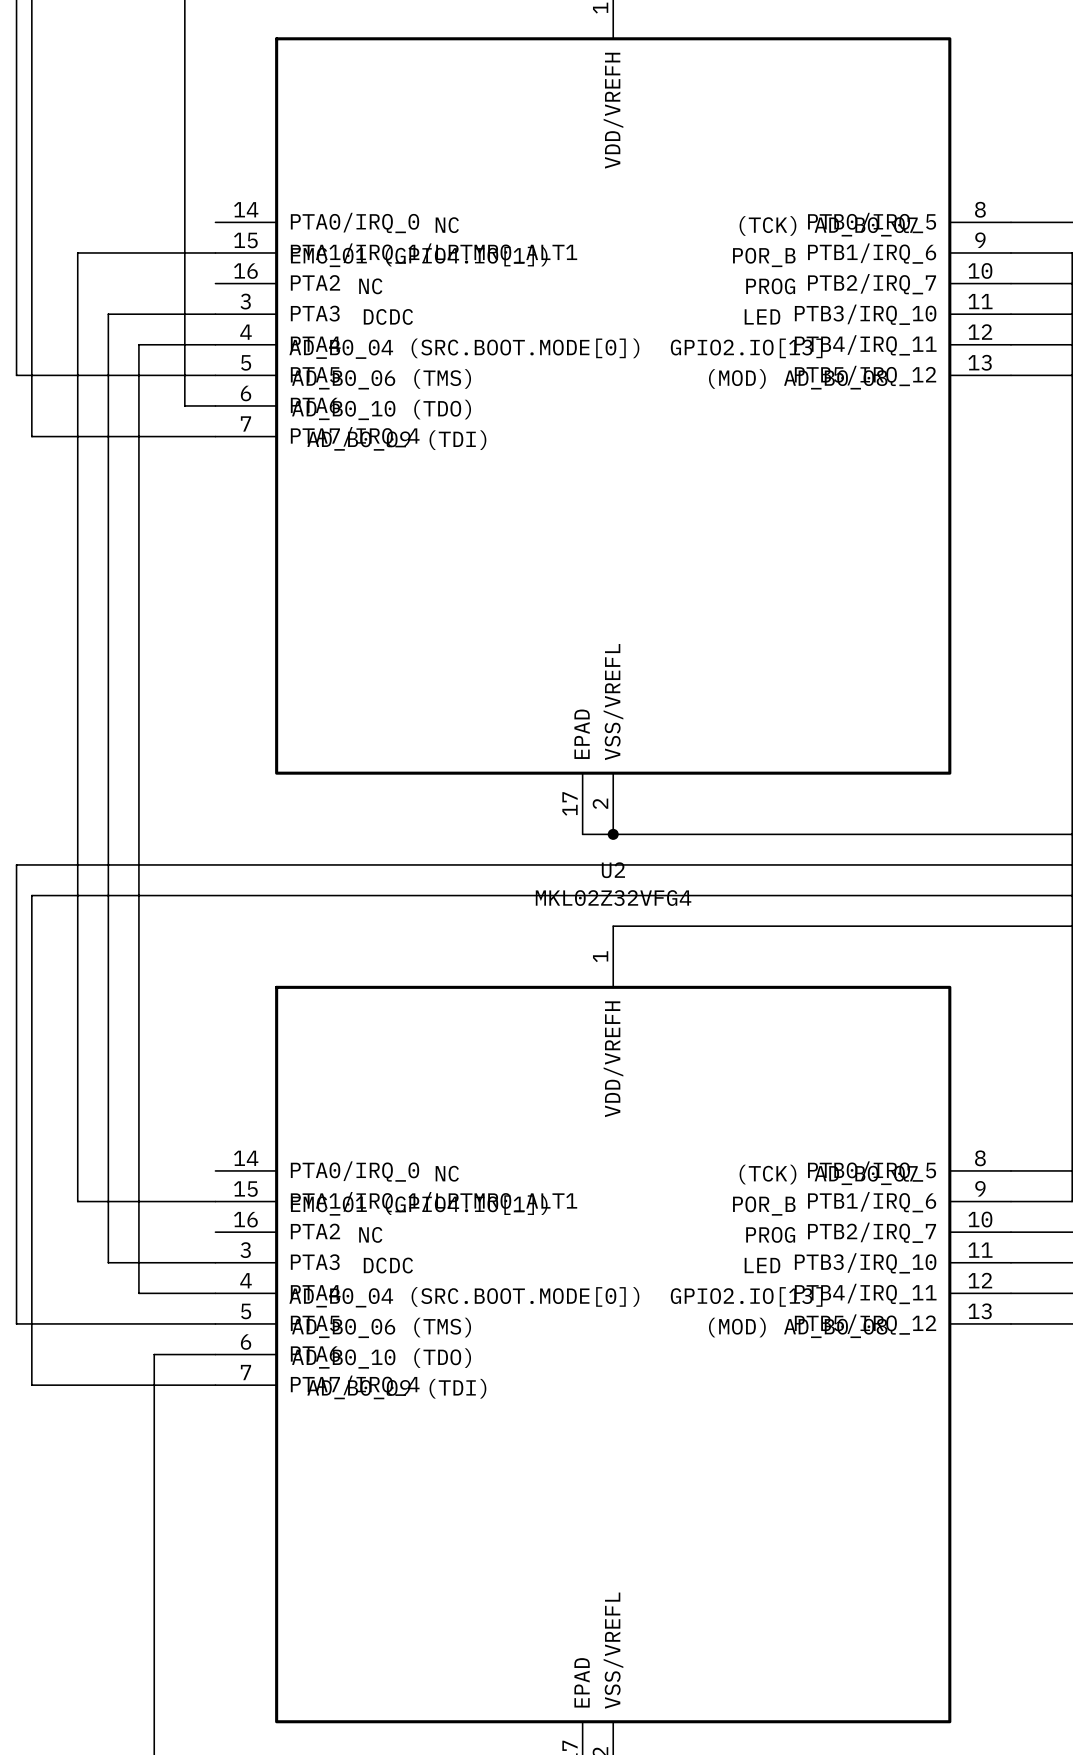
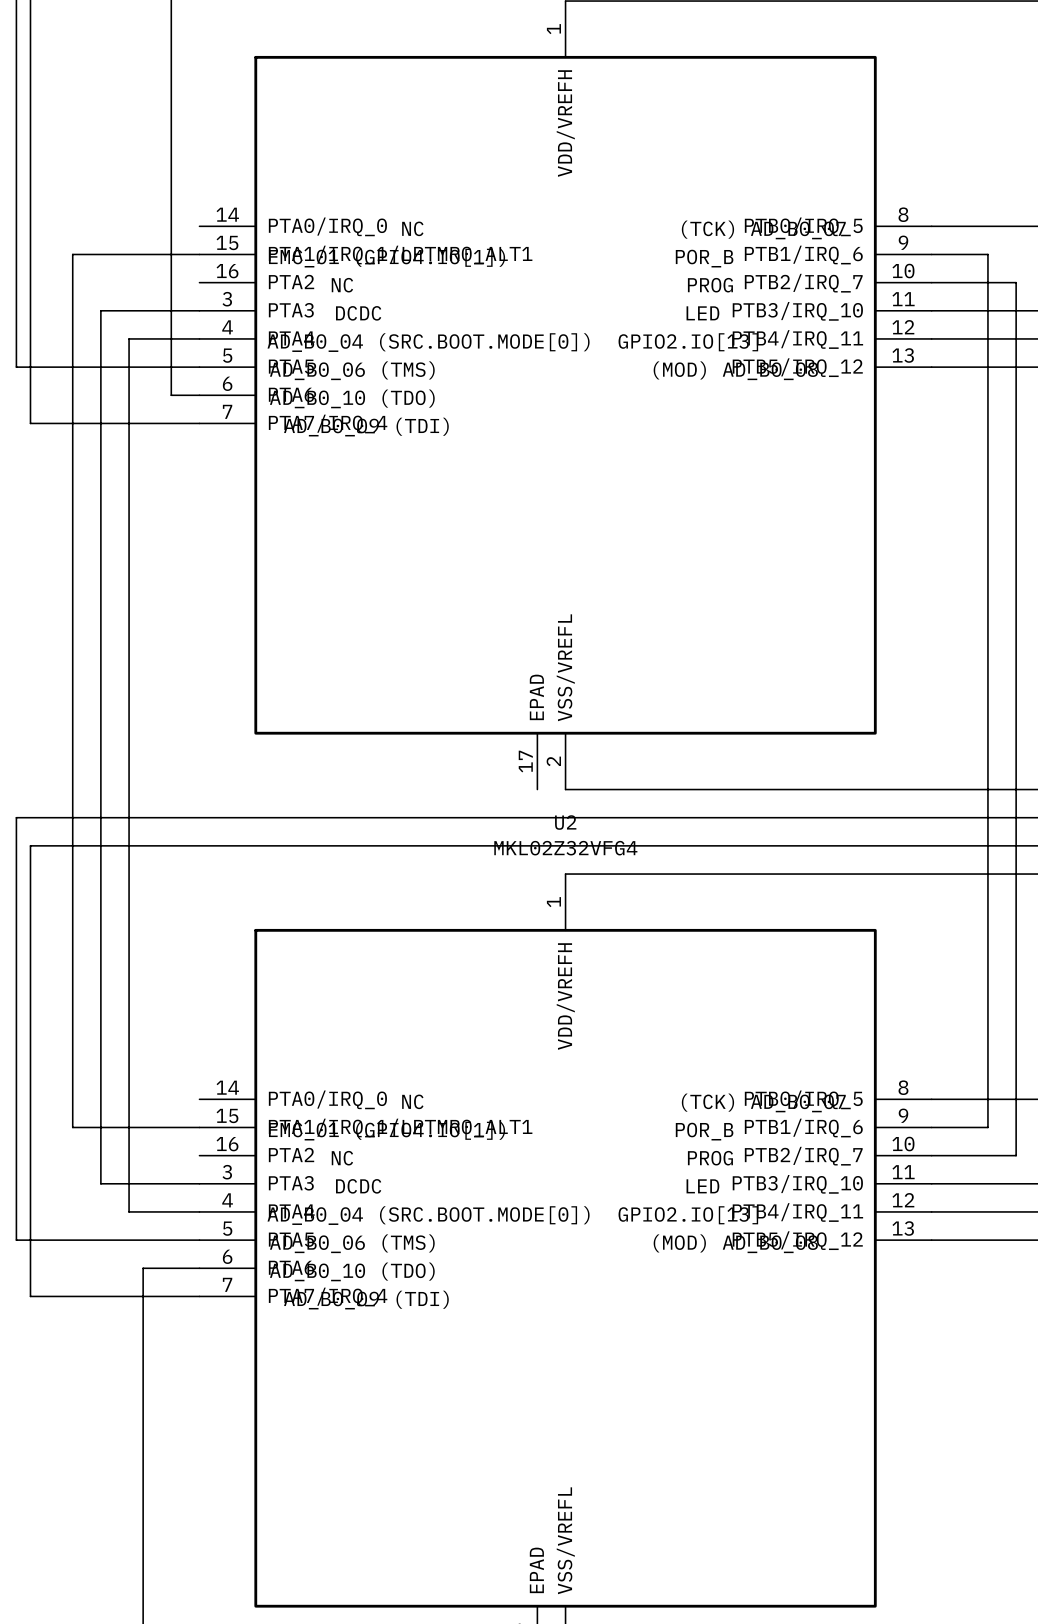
wire: (582, 834) (613, 834) -> none
junction: (613, 834) -> none

